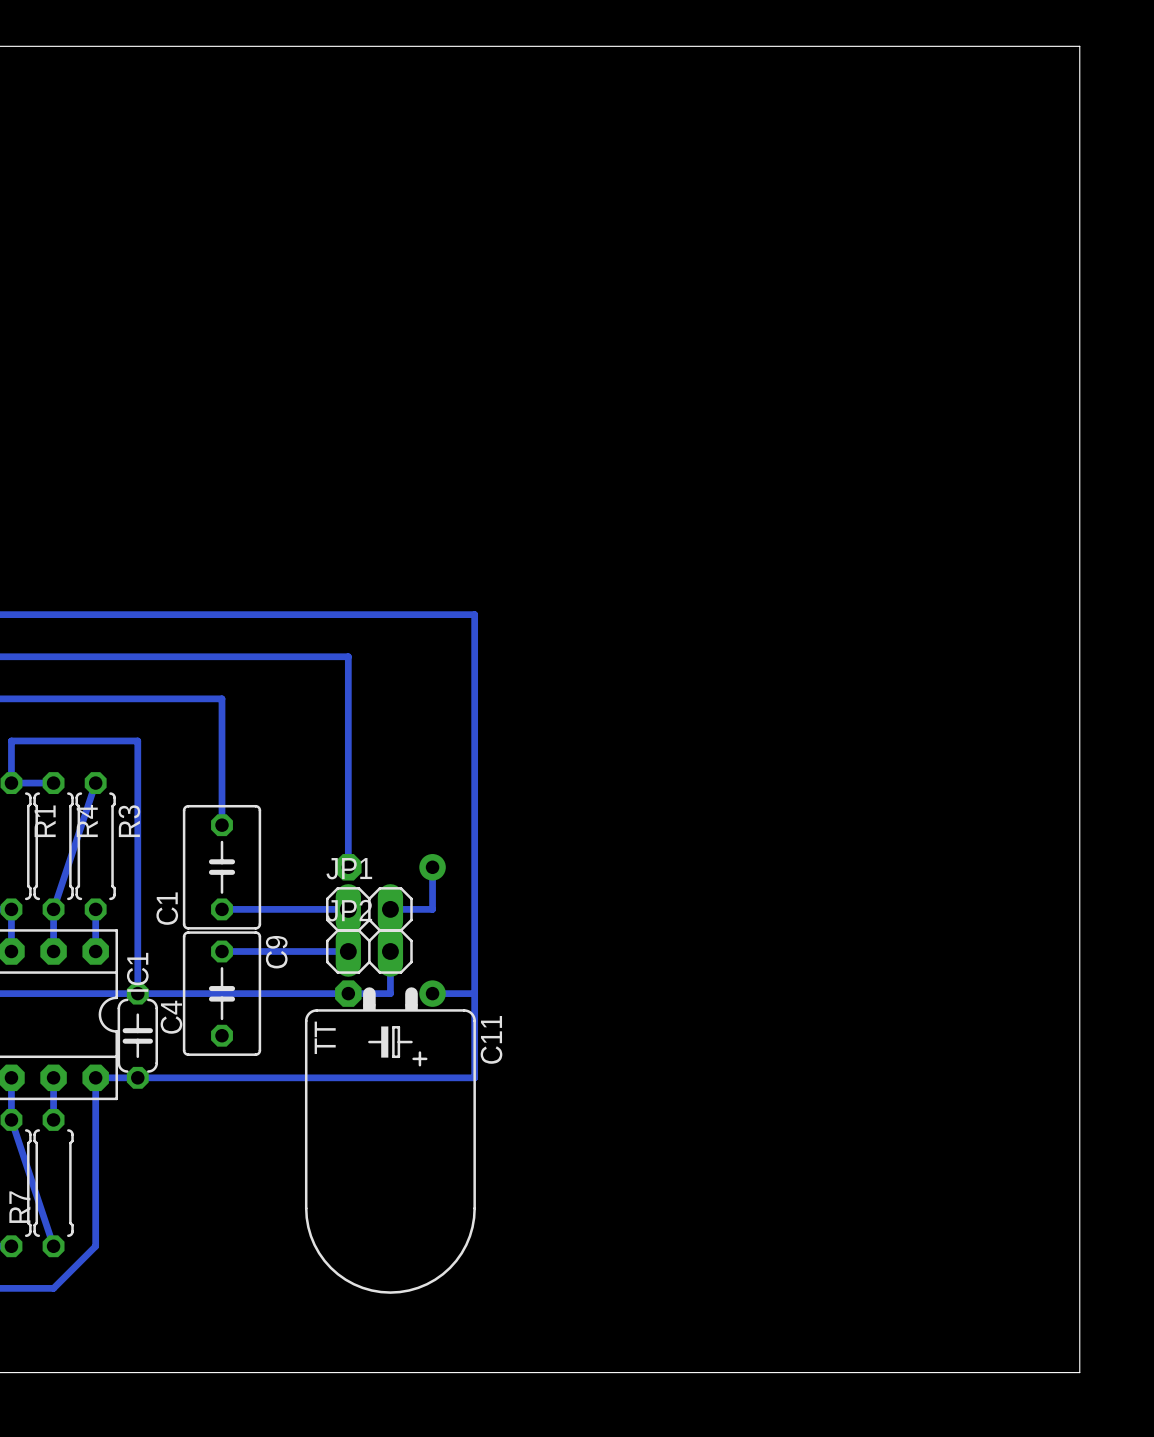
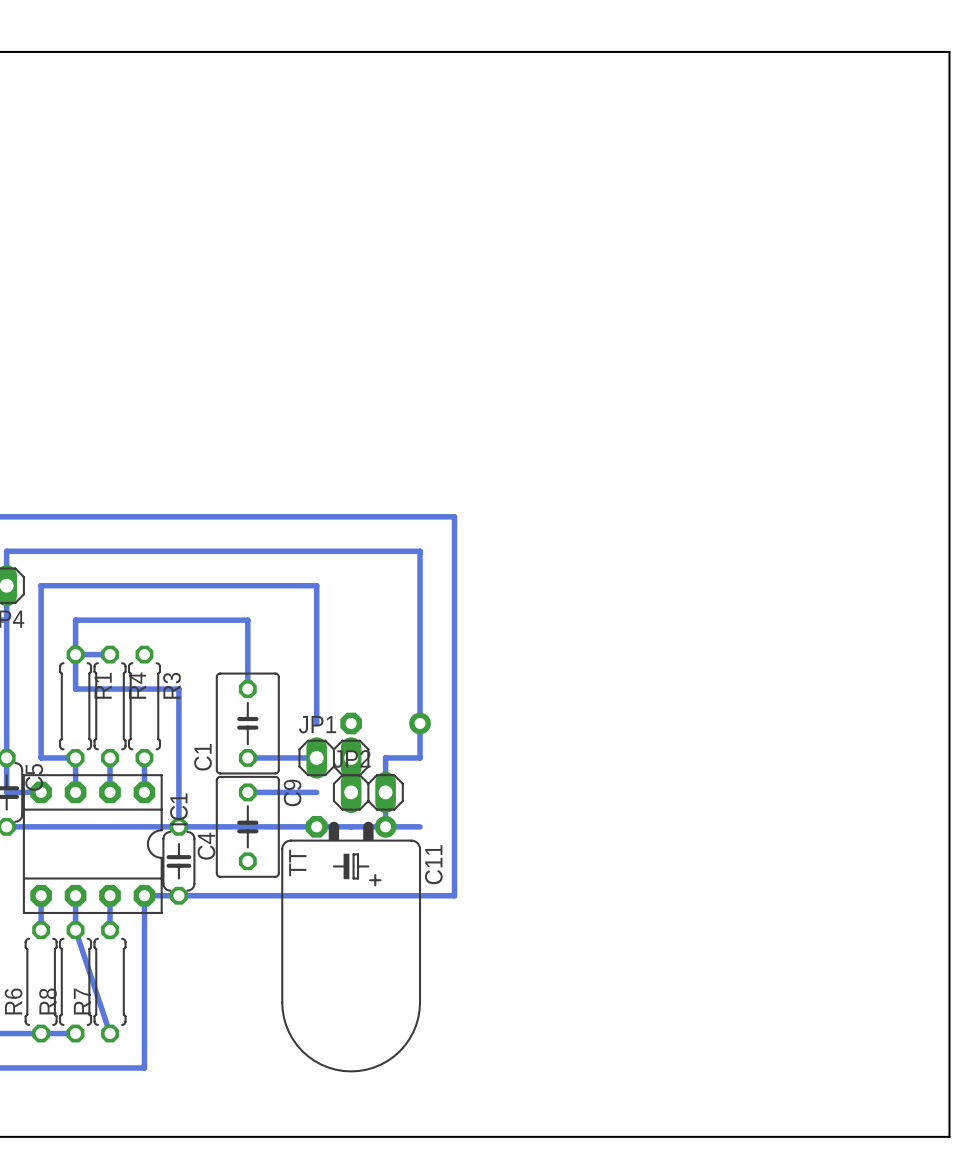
bottom track: (348, 656) (348, 867) -> (351, 551) (420, 551) (420, 723)
bottom track: (222, 698) (222, 740) -> (178, 620) (247, 620)
bottom track: none -> (247, 585) (316, 585) (316, 723)
bottom track: (137, 740) (137, 825) -> (75, 654) (75, 689) (178, 689)
bottom track: (95, 783) (53, 909) -> none
bottom track: (306, 909) (348, 909) -> none
JP1 position: (369, 909) -> (333, 757)
bottom track: (306, 951) (348, 951) -> none
bottom track: (432, 993) (474, 993) -> (420, 826) (385, 826)
C11 position: (390, 1137) -> (351, 944)
bottom track: (95, 1246) (53, 1288) -> (144, 1033) (144, 1067) (110, 1067)

